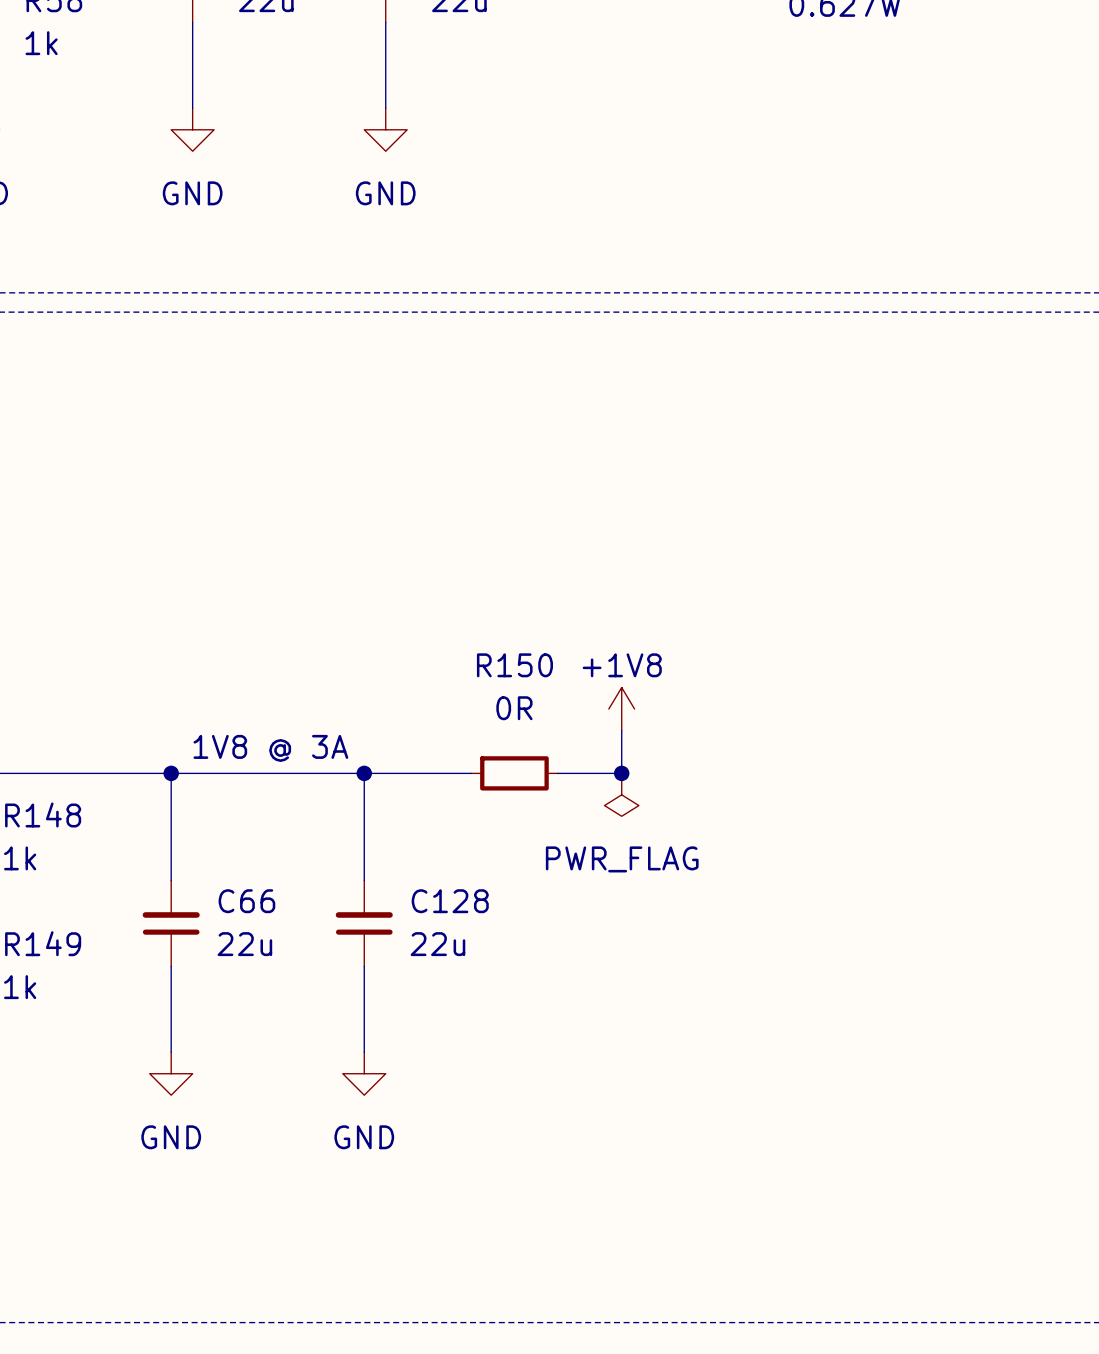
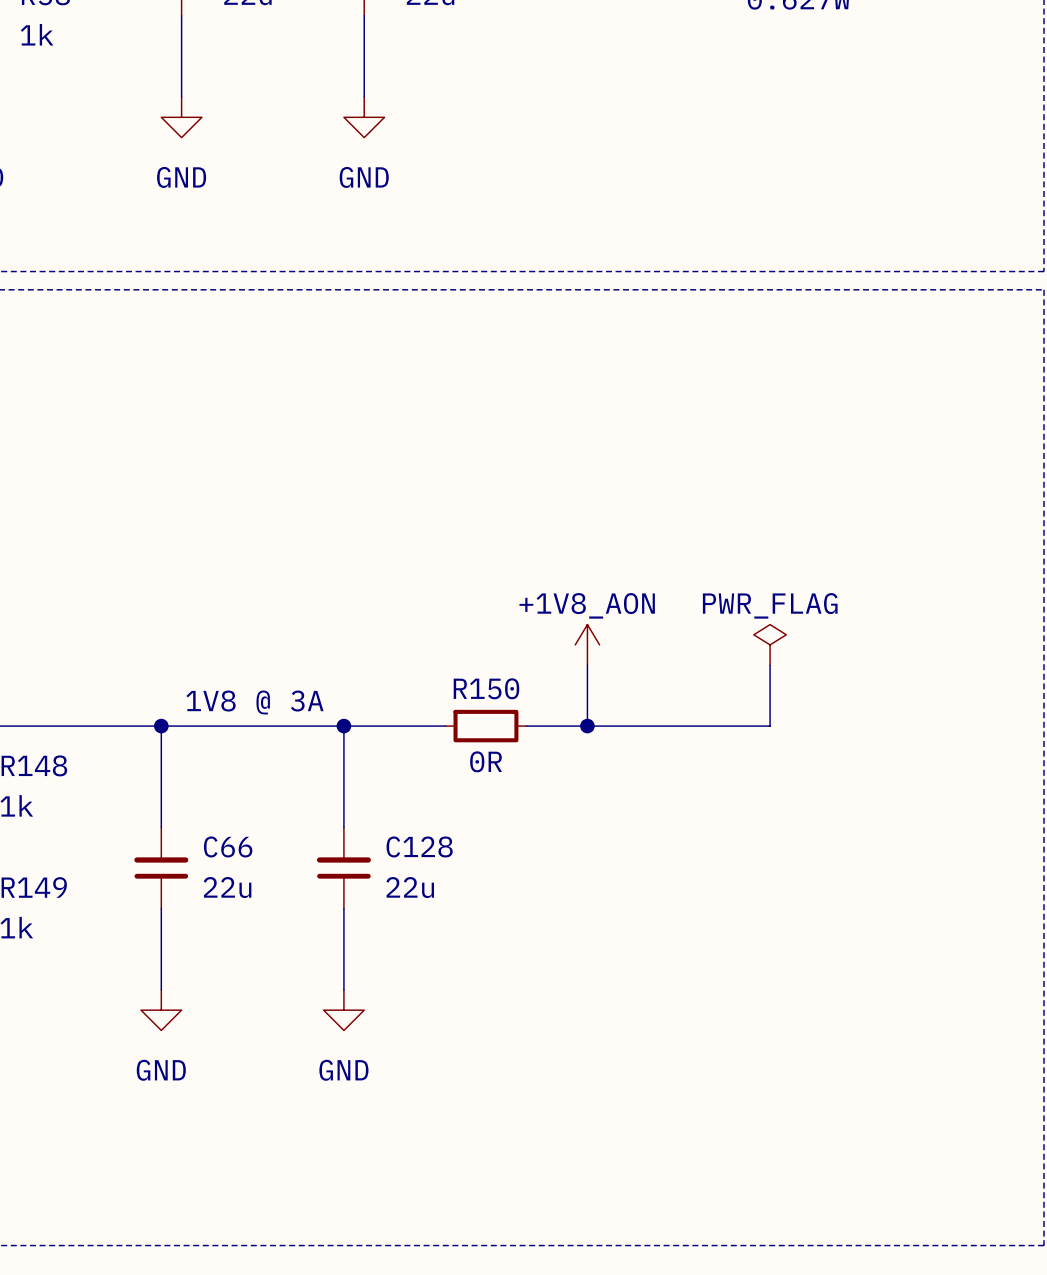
R150 name position: R150 (514, 665) -> R150 (486, 688)
power symbol: none -> +1V8_AON (587, 644)
R150 text position: 0R (514, 708) -> 0R (486, 761)
power symbol: +1V8 (621, 709) -> none
wire: none -> (770, 665) (770, 726) (587, 726)
power symbol rotation: 0° (621, 794) -> 180° (770, 644)
power symbol position: PWR_FLAG (621, 794) -> PWR_FLAG (770, 644)

